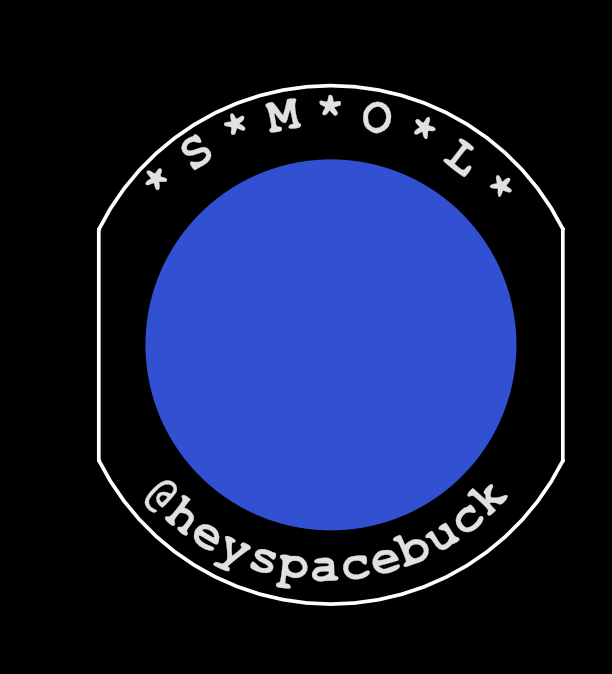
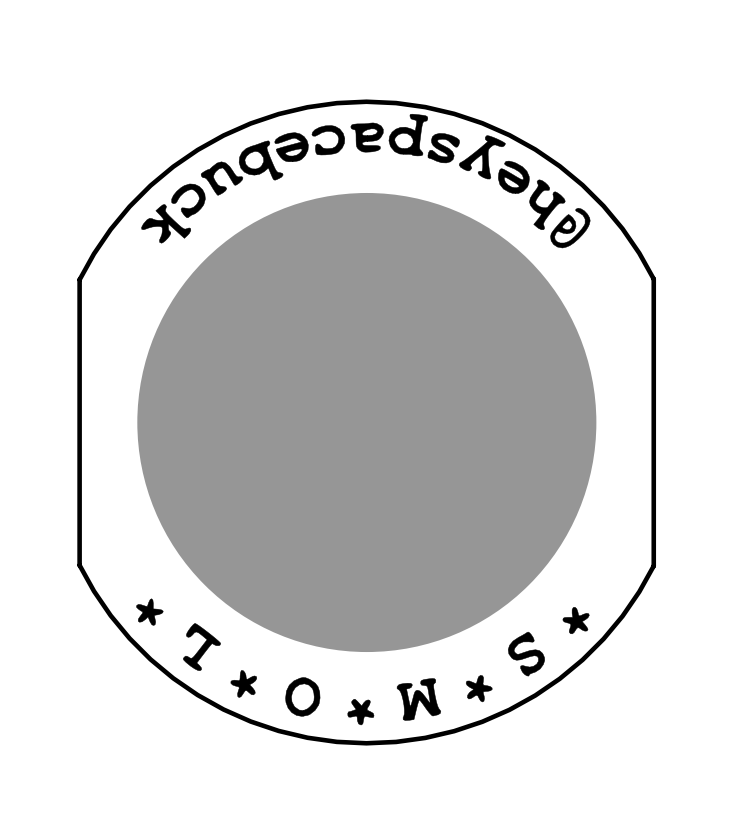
drawing shape: [144, 94, 512, 589] -> [136, 113, 591, 726]

